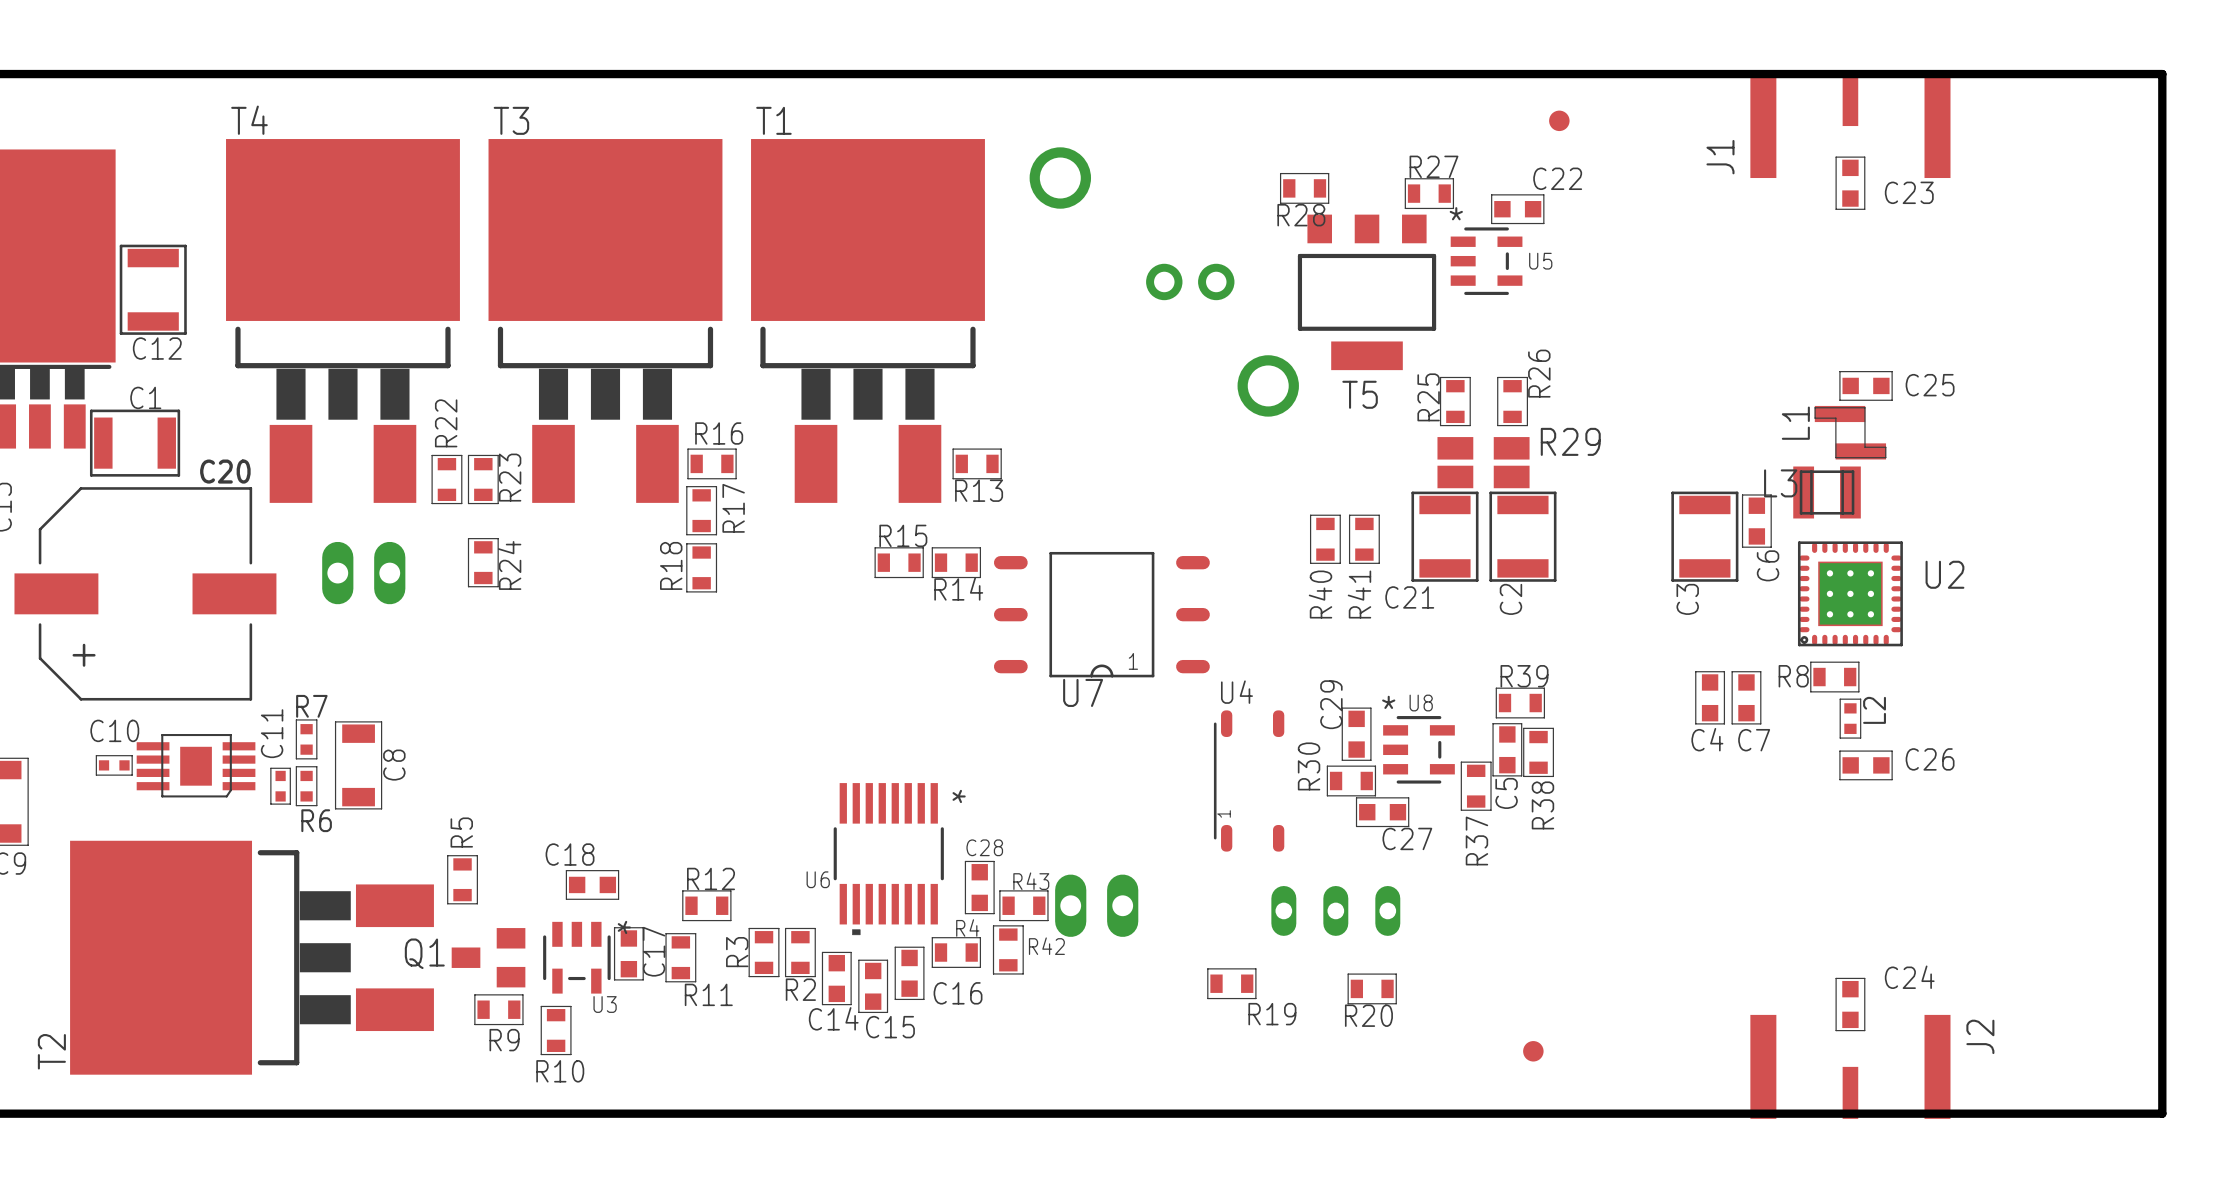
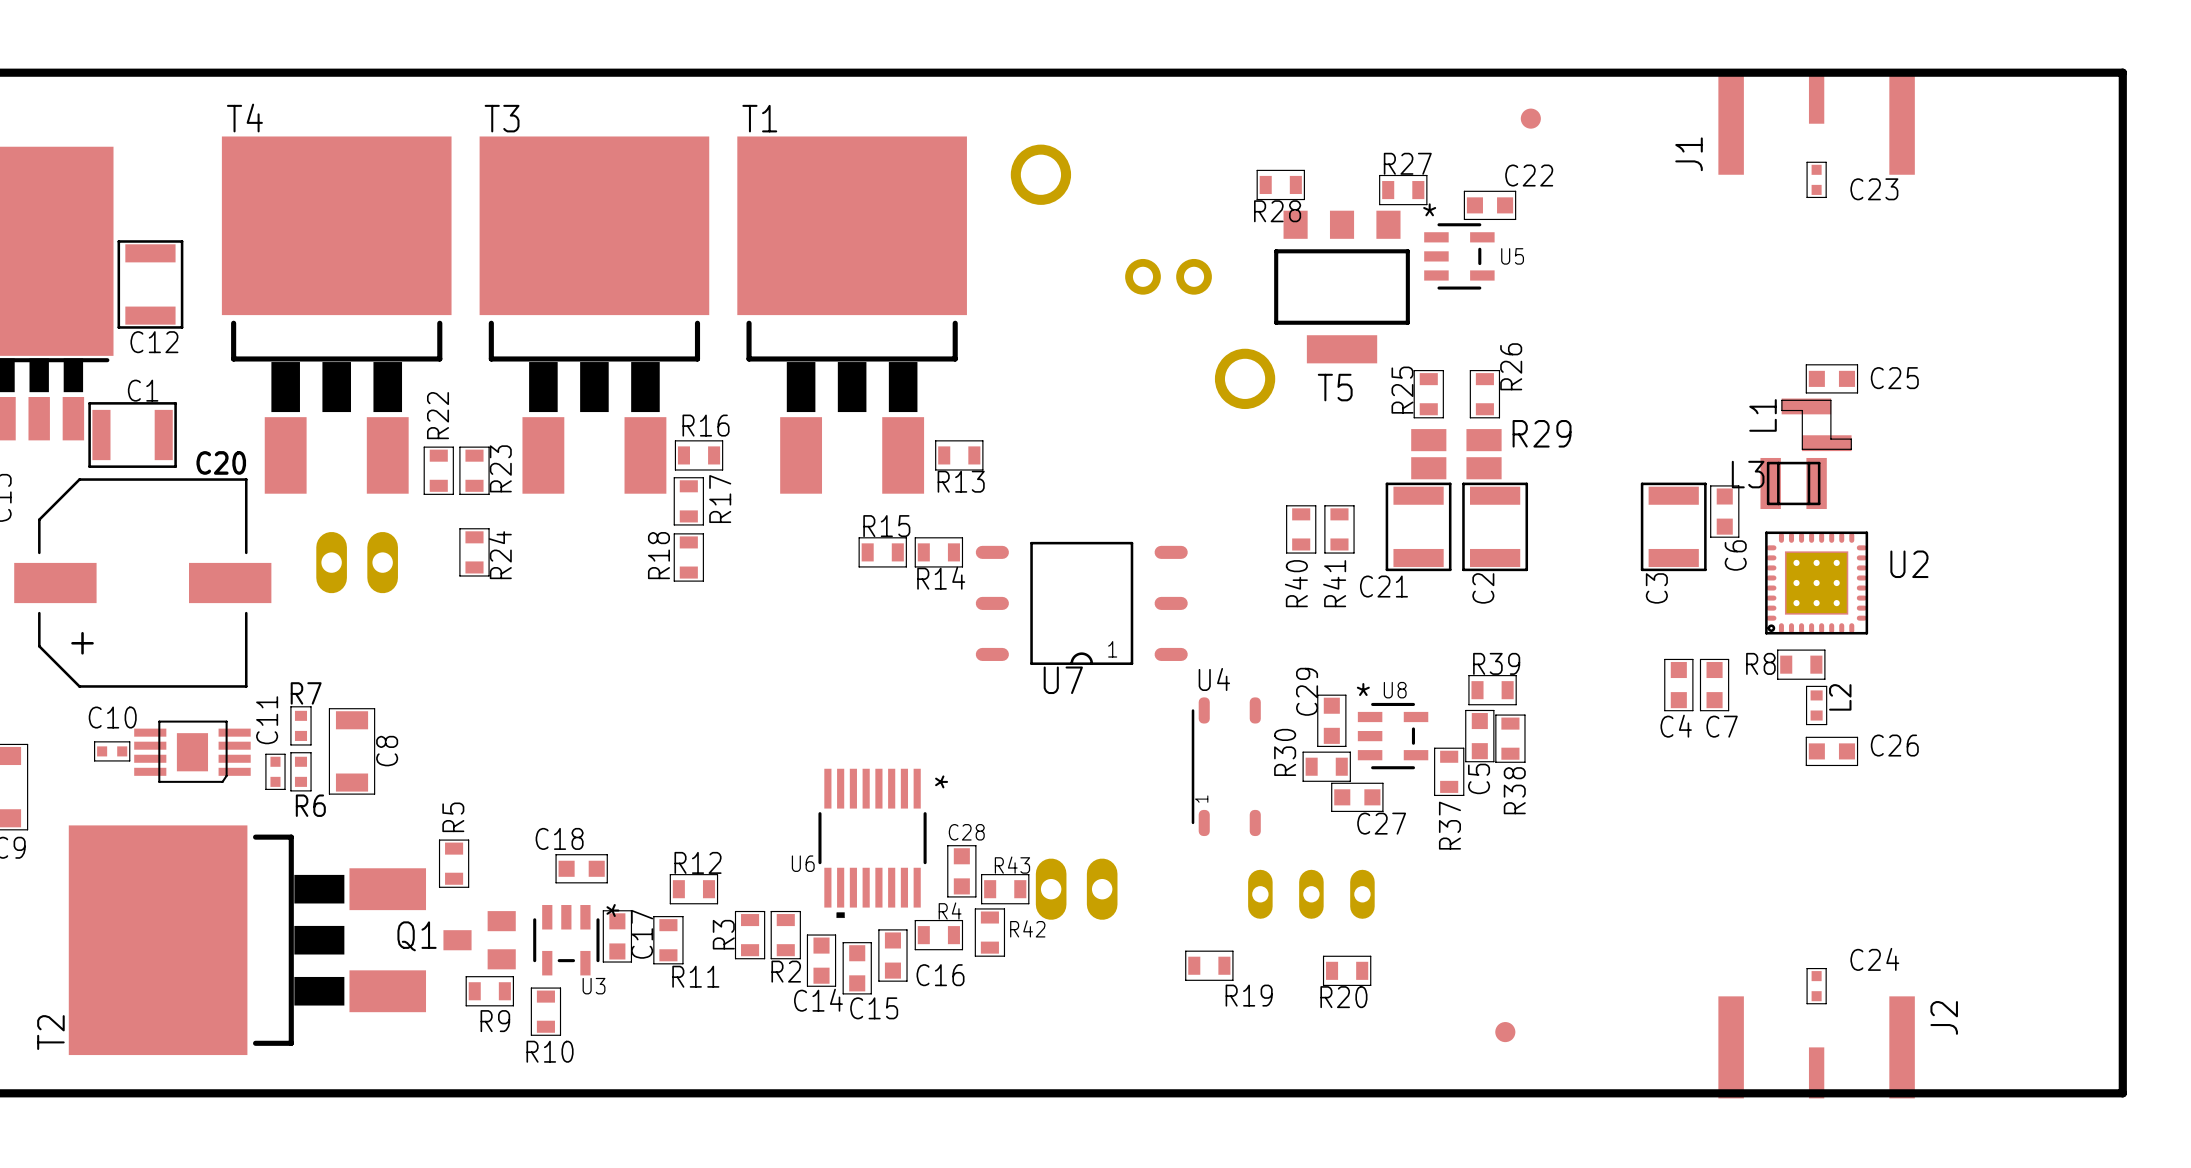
C23 footprint: [1835, 156, 1866, 210] -> [1806, 161, 1827, 198]
C24 footprint: [1835, 977, 1866, 1032] -> [1806, 968, 1827, 1005]

